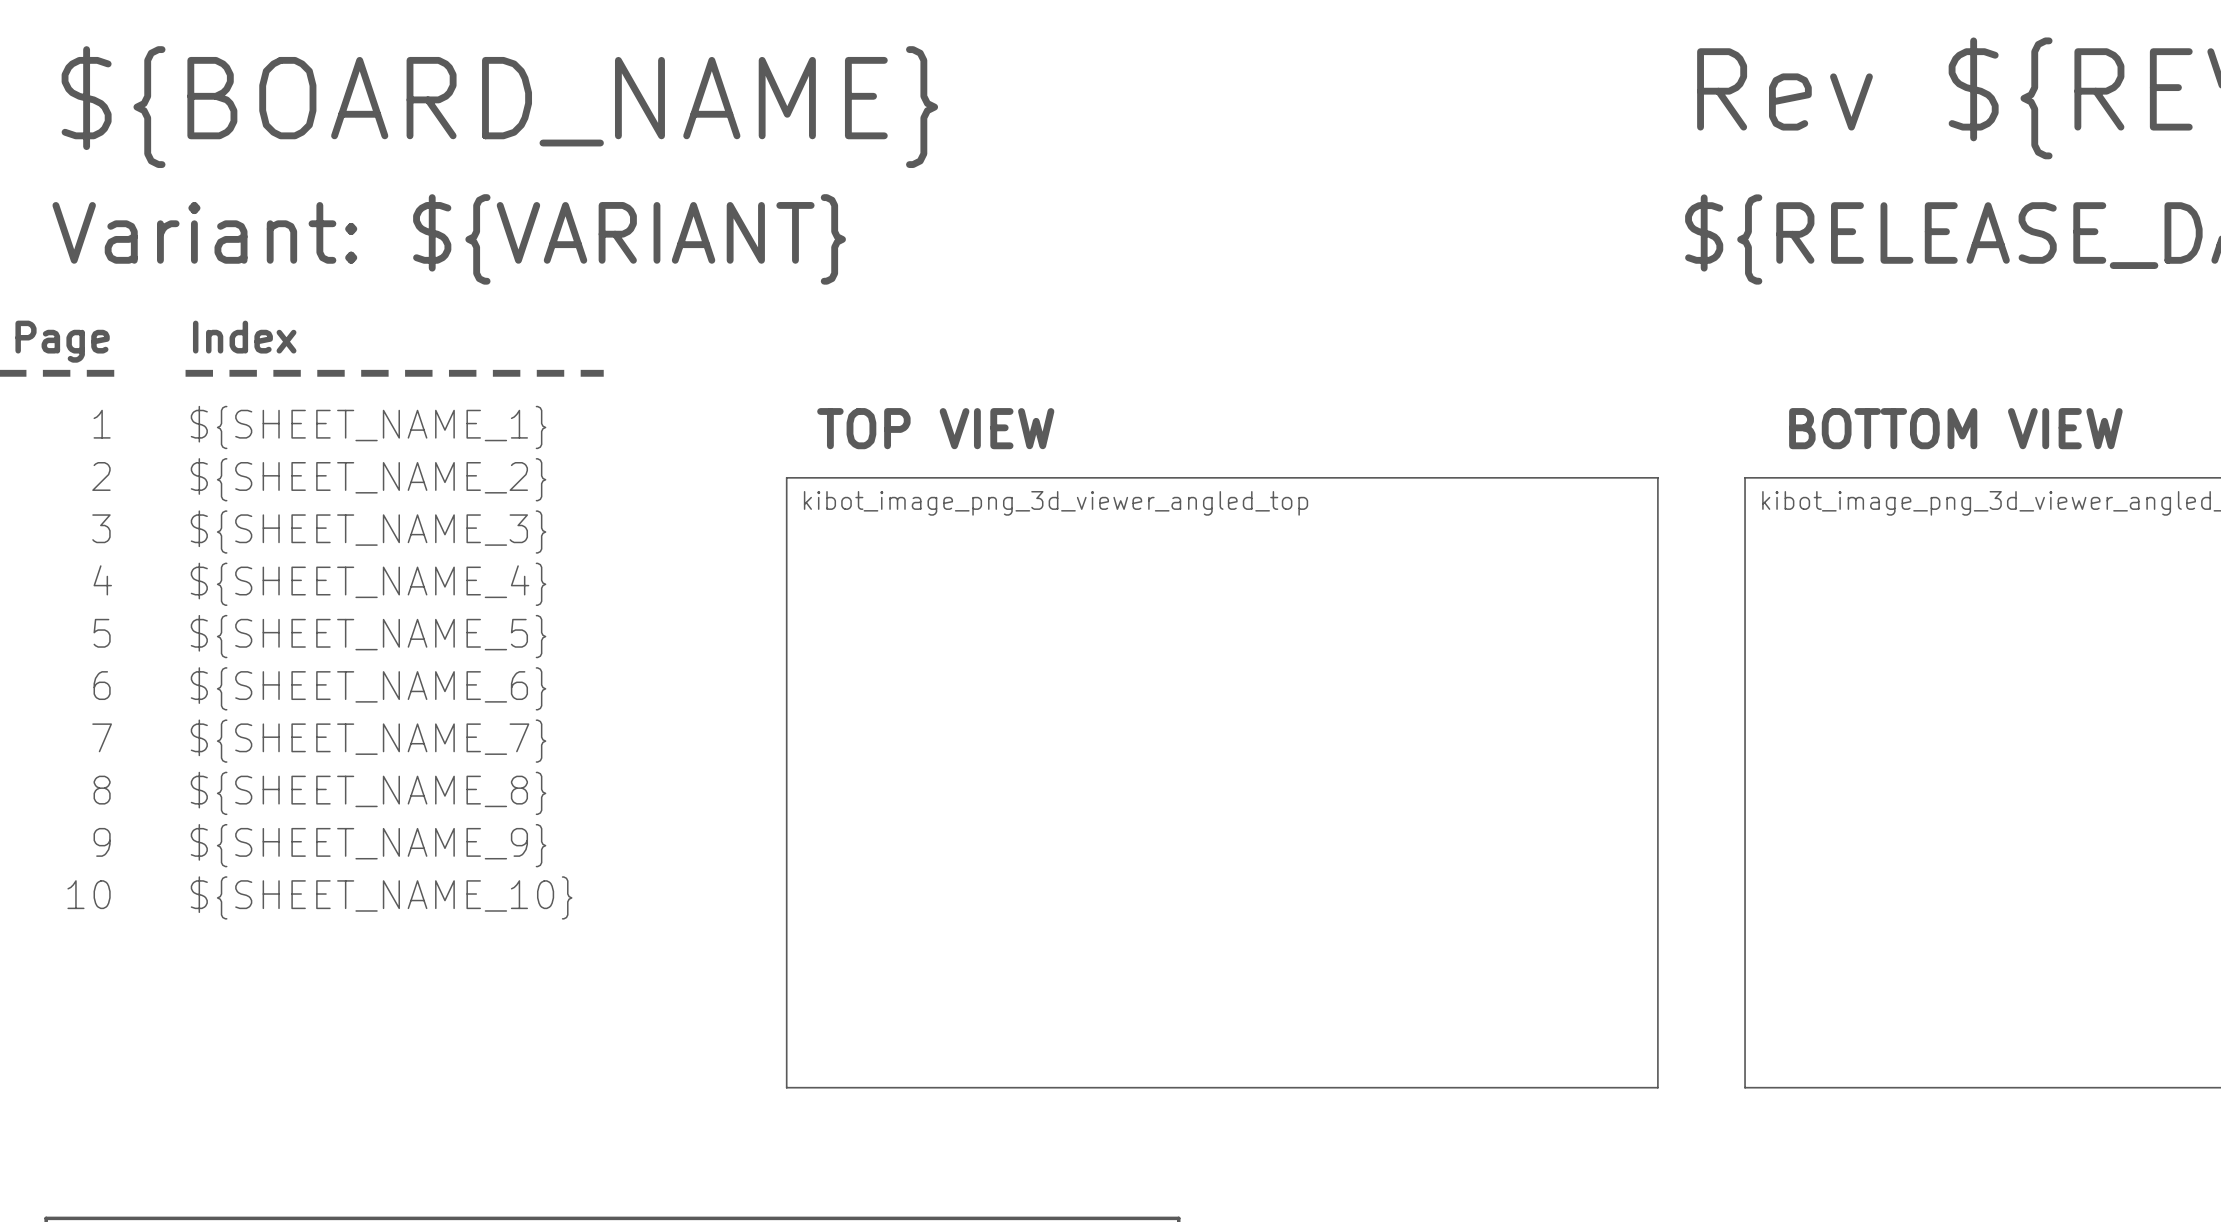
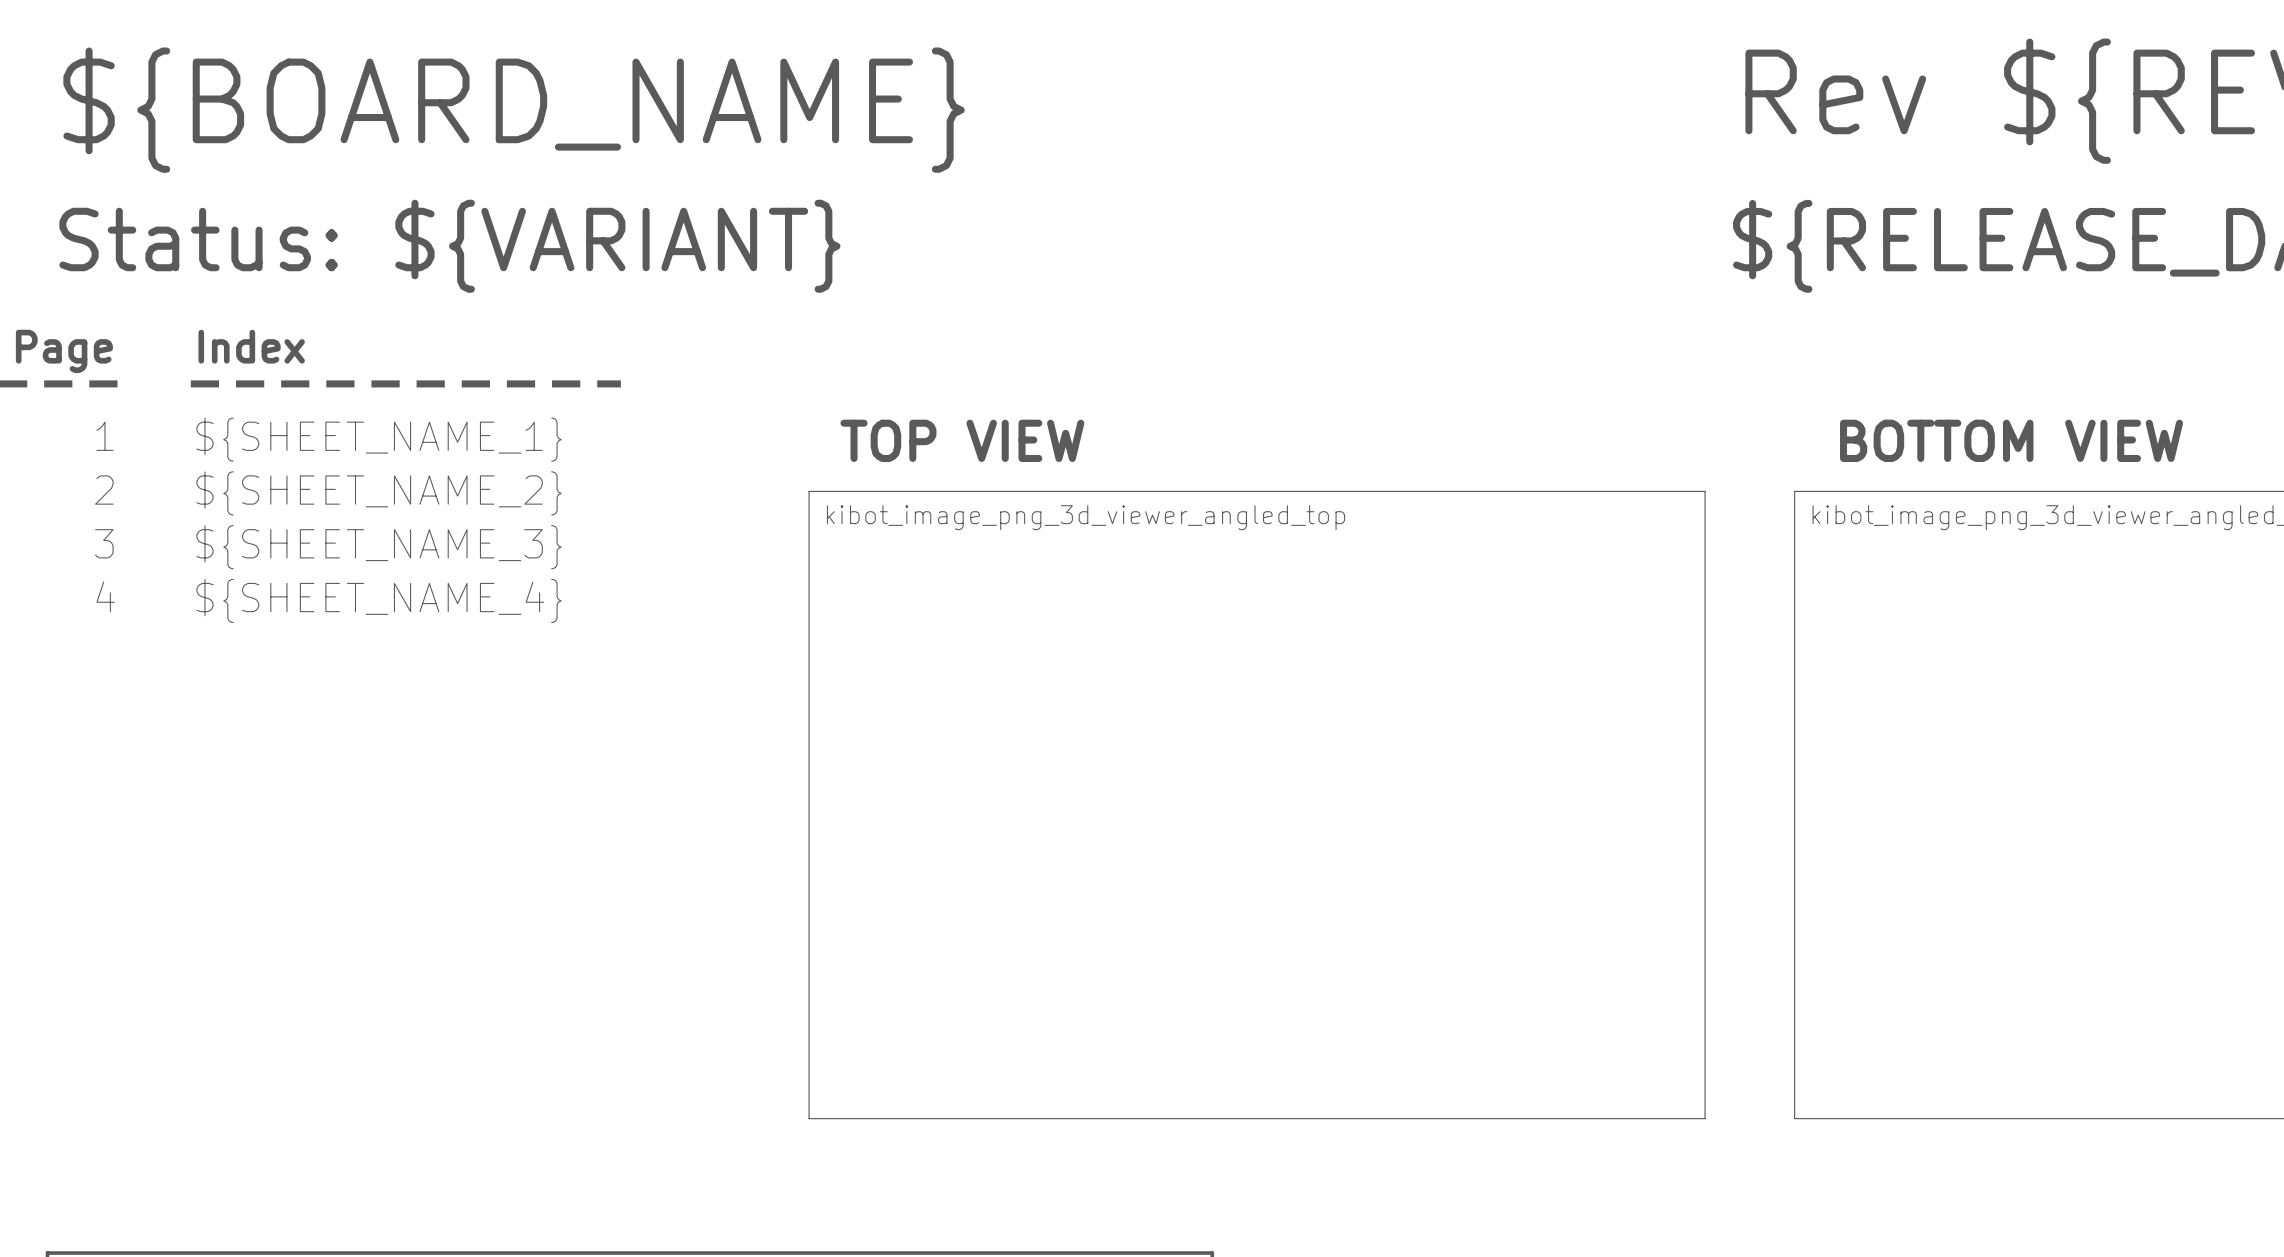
text: Variant: ${VARIANT} (449, 239) -> Status: ${VARIANT} (449, 246)
text: 5 (102, 633) -> none
text: ${SHEET_NAME_5} (368, 636) -> none
text: 6 (102, 685) -> none
text: ${SHEET_NAME_6} (368, 688) -> none
text: 7 (102, 737) -> none
text: ${SHEET_NAME_7} (368, 741) -> none
text: 8 (102, 790) -> none
text: ${SHEET_NAME_8} (368, 793) -> none
text: 9 (102, 842) -> none
text: ${SHEET_NAME_9} (368, 845) -> none
text: 10 (89, 894) -> none
text: ${SHEET_NAME_10} (381, 897) -> none

